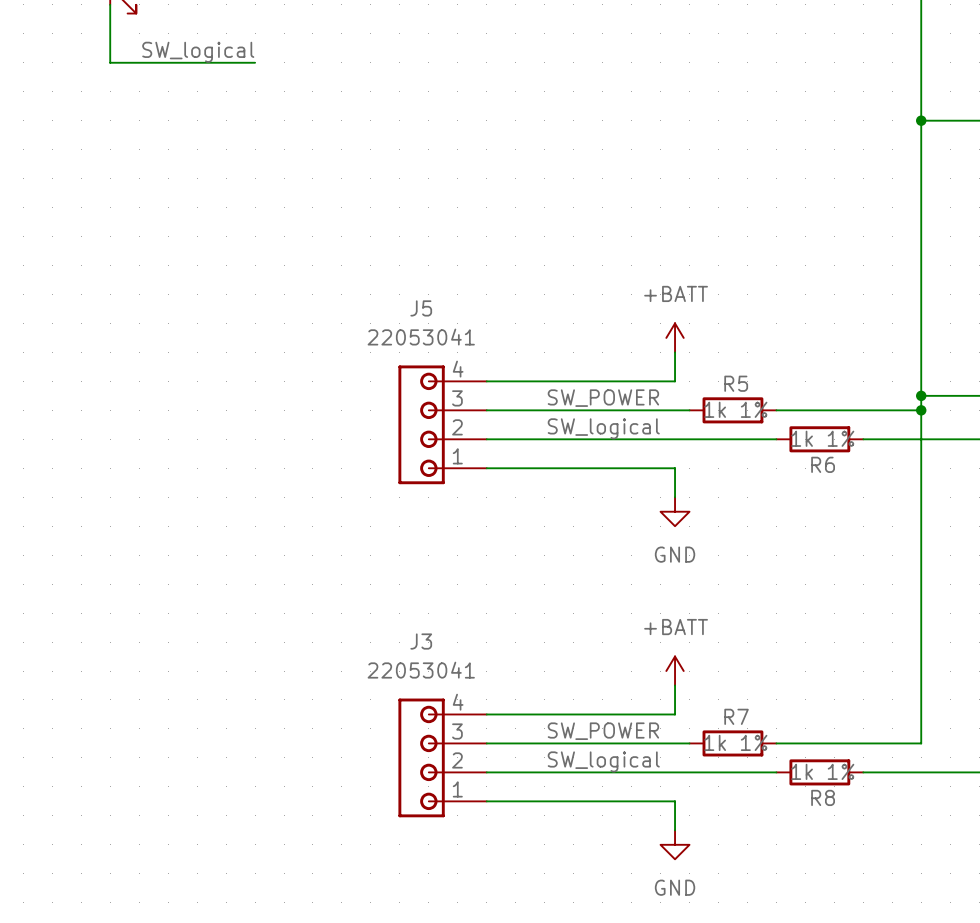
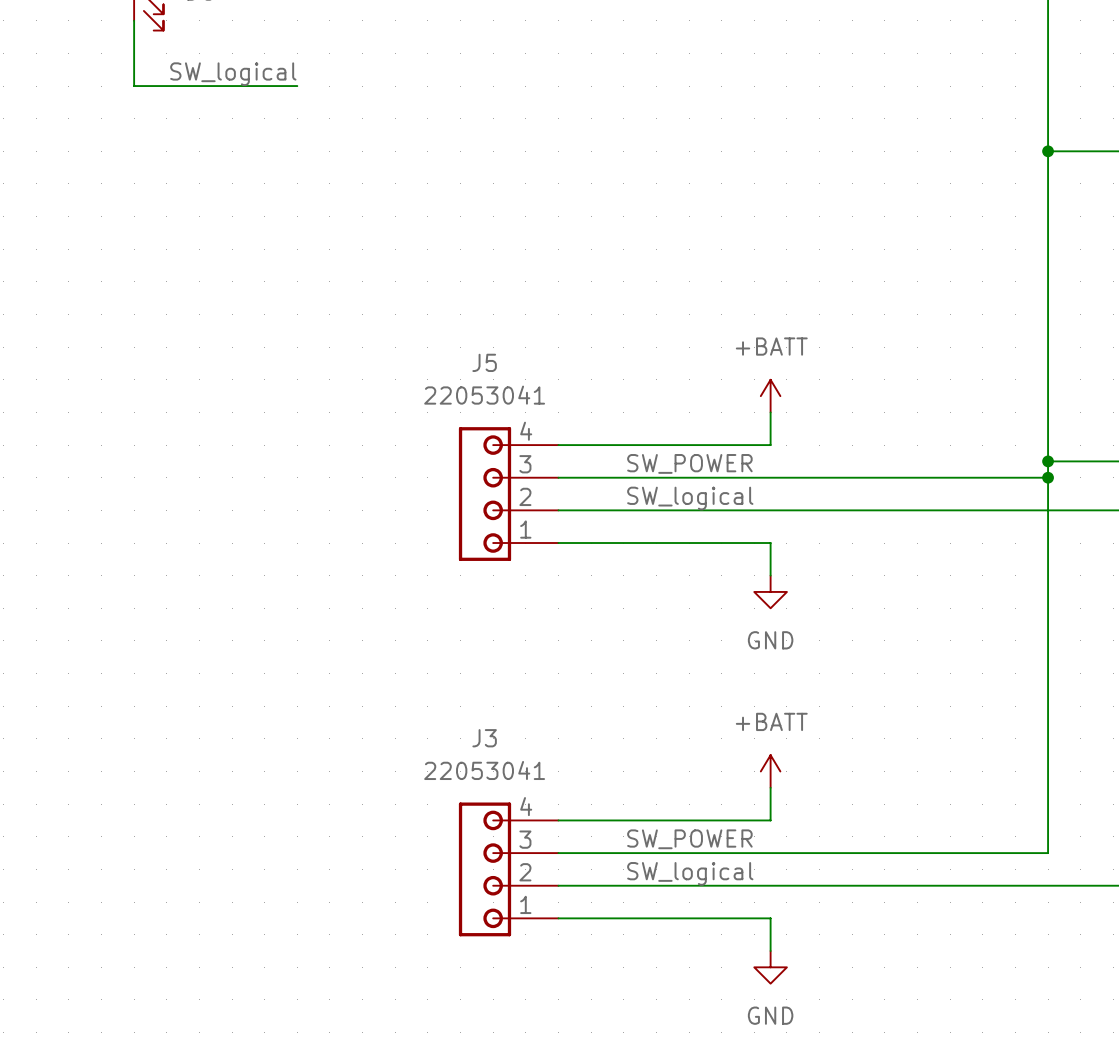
wire: none -> (786, 477) (884, 477)
R5: 1k 1% (732, 410) -> none
wire: none -> (884, 510) (982, 510)
R6: 1k 1% (819, 439) -> none
wire: none -> (786, 853) (884, 853)
R7: 1k 1% (732, 743) -> none
wire: none -> (884, 885) (982, 885)
R8: 1k 1% (819, 772) -> none

